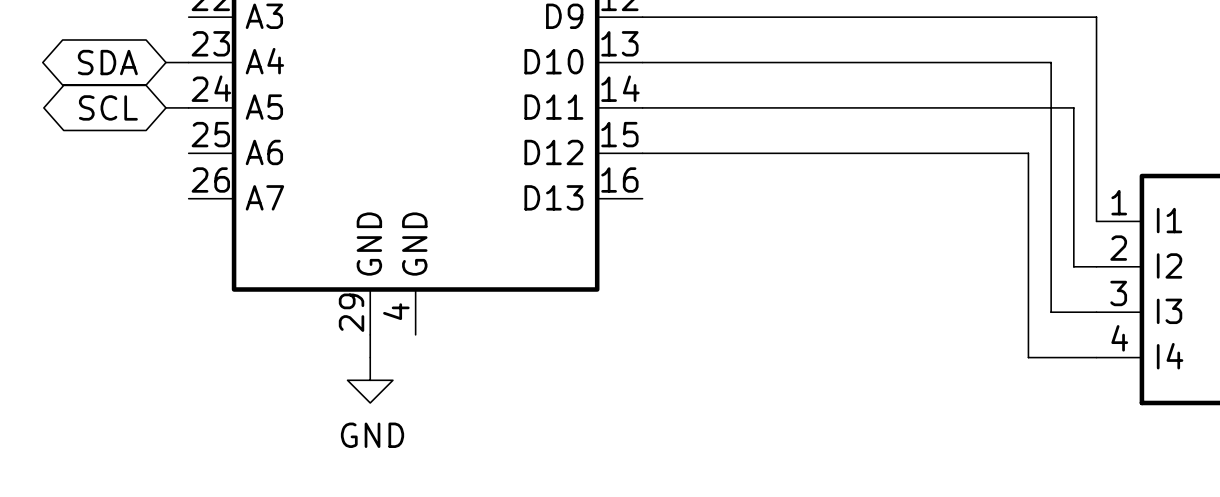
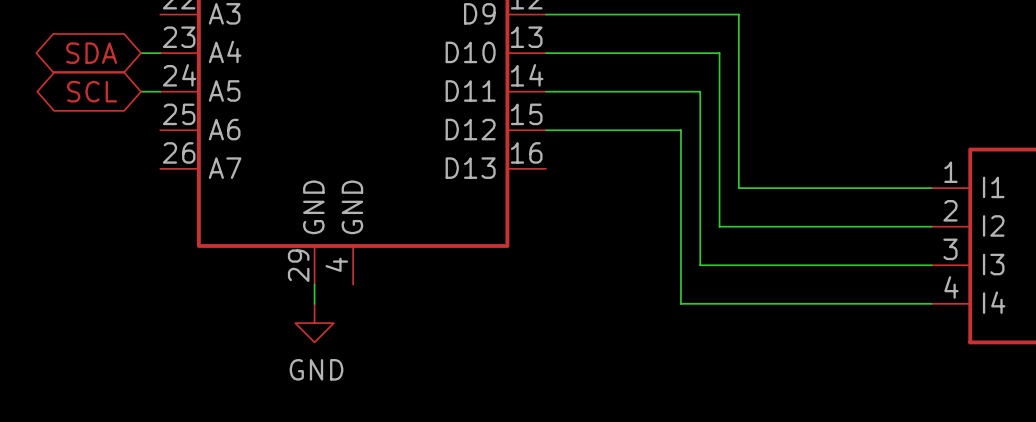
wire: (869, 17) (1096, 17) (1096, 221) -> (738, 14) (738, 188) (931, 188)
wire: (846, 62) (1051, 62) (1051, 312) -> (700, 91) (700, 265) (893, 265)
wire: (824, 107) (1073, 107) (1073, 266) -> (719, 53) (719, 226) (912, 226)
wire: (801, 153) (1028, 153) (1028, 357) -> (680, 130) (680, 303) (873, 303)

